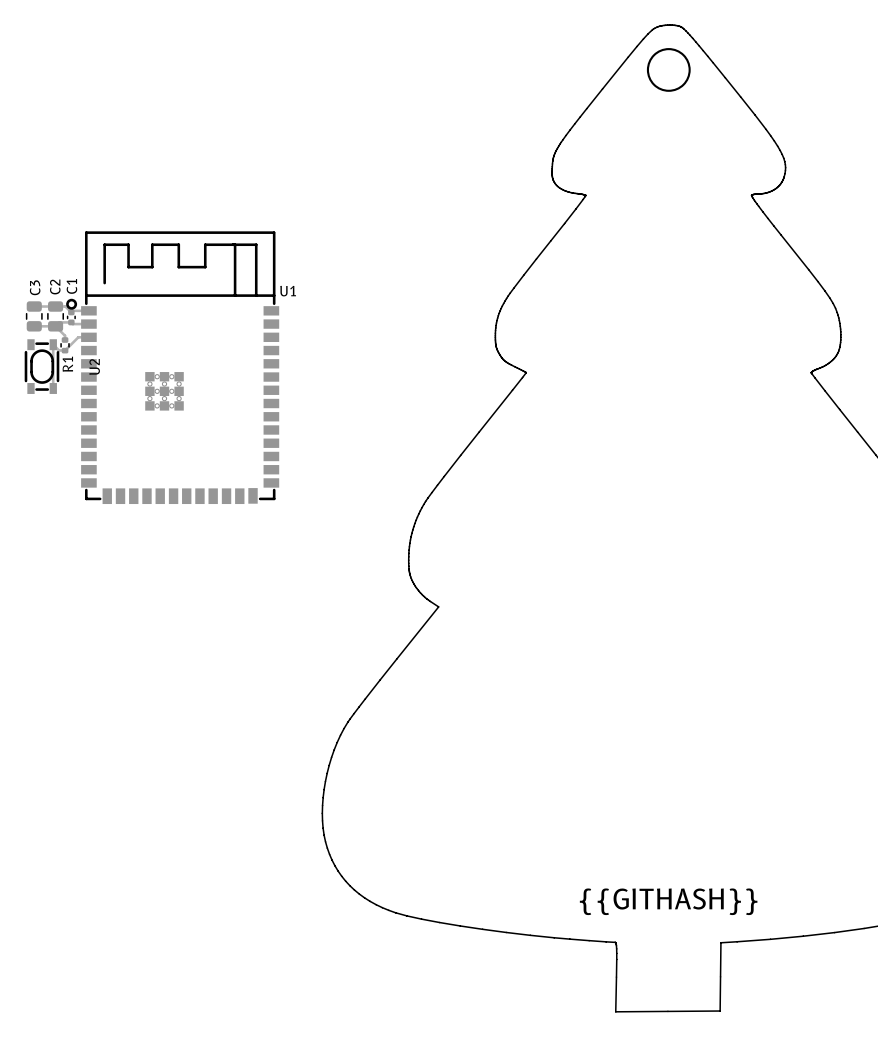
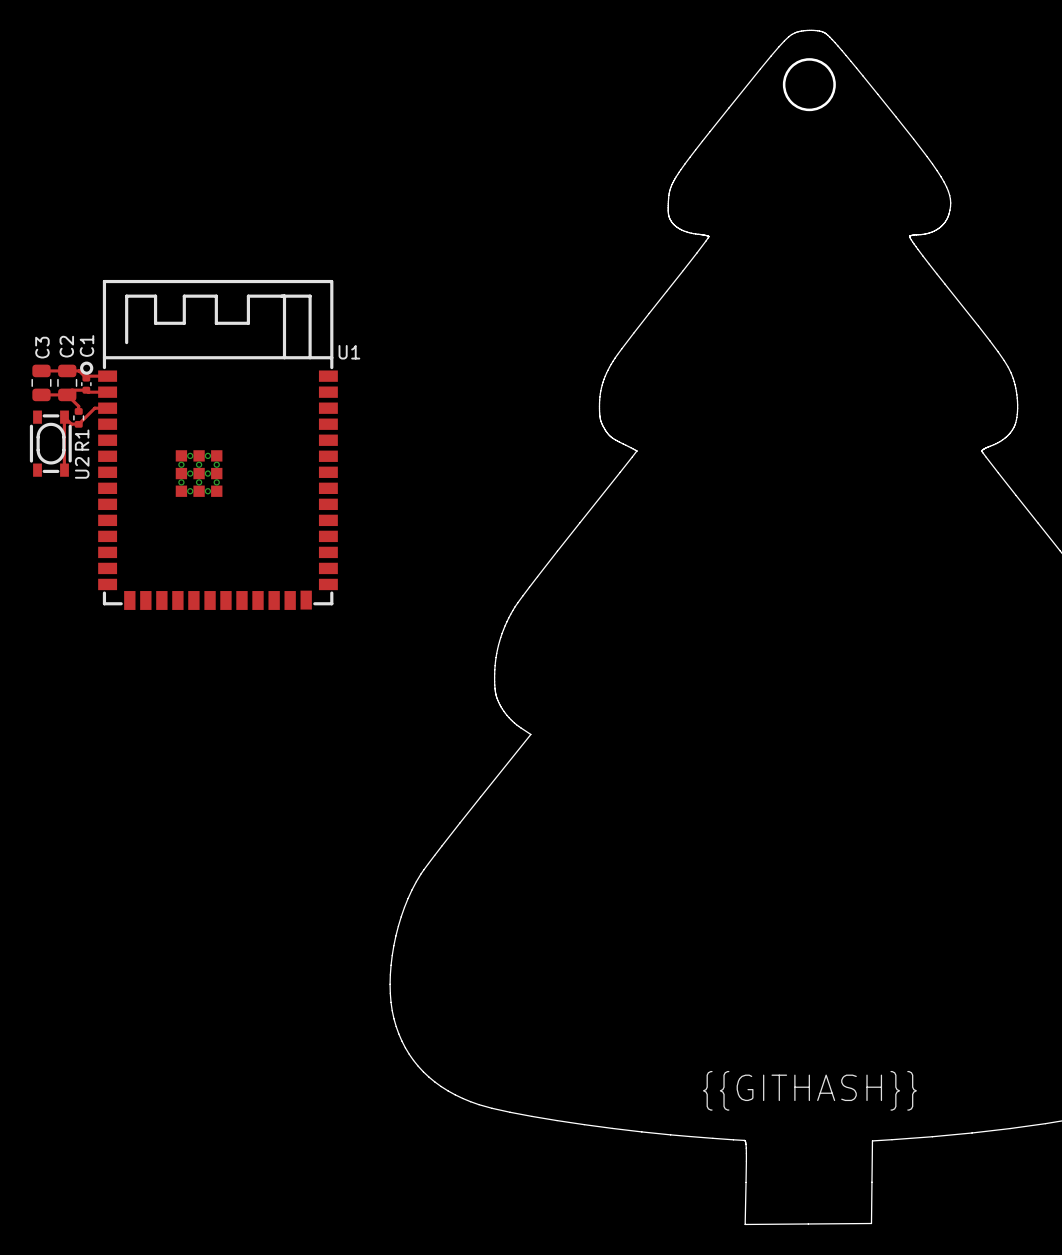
U2 name position: U2 (94, 366) -> U2 (82, 467)

